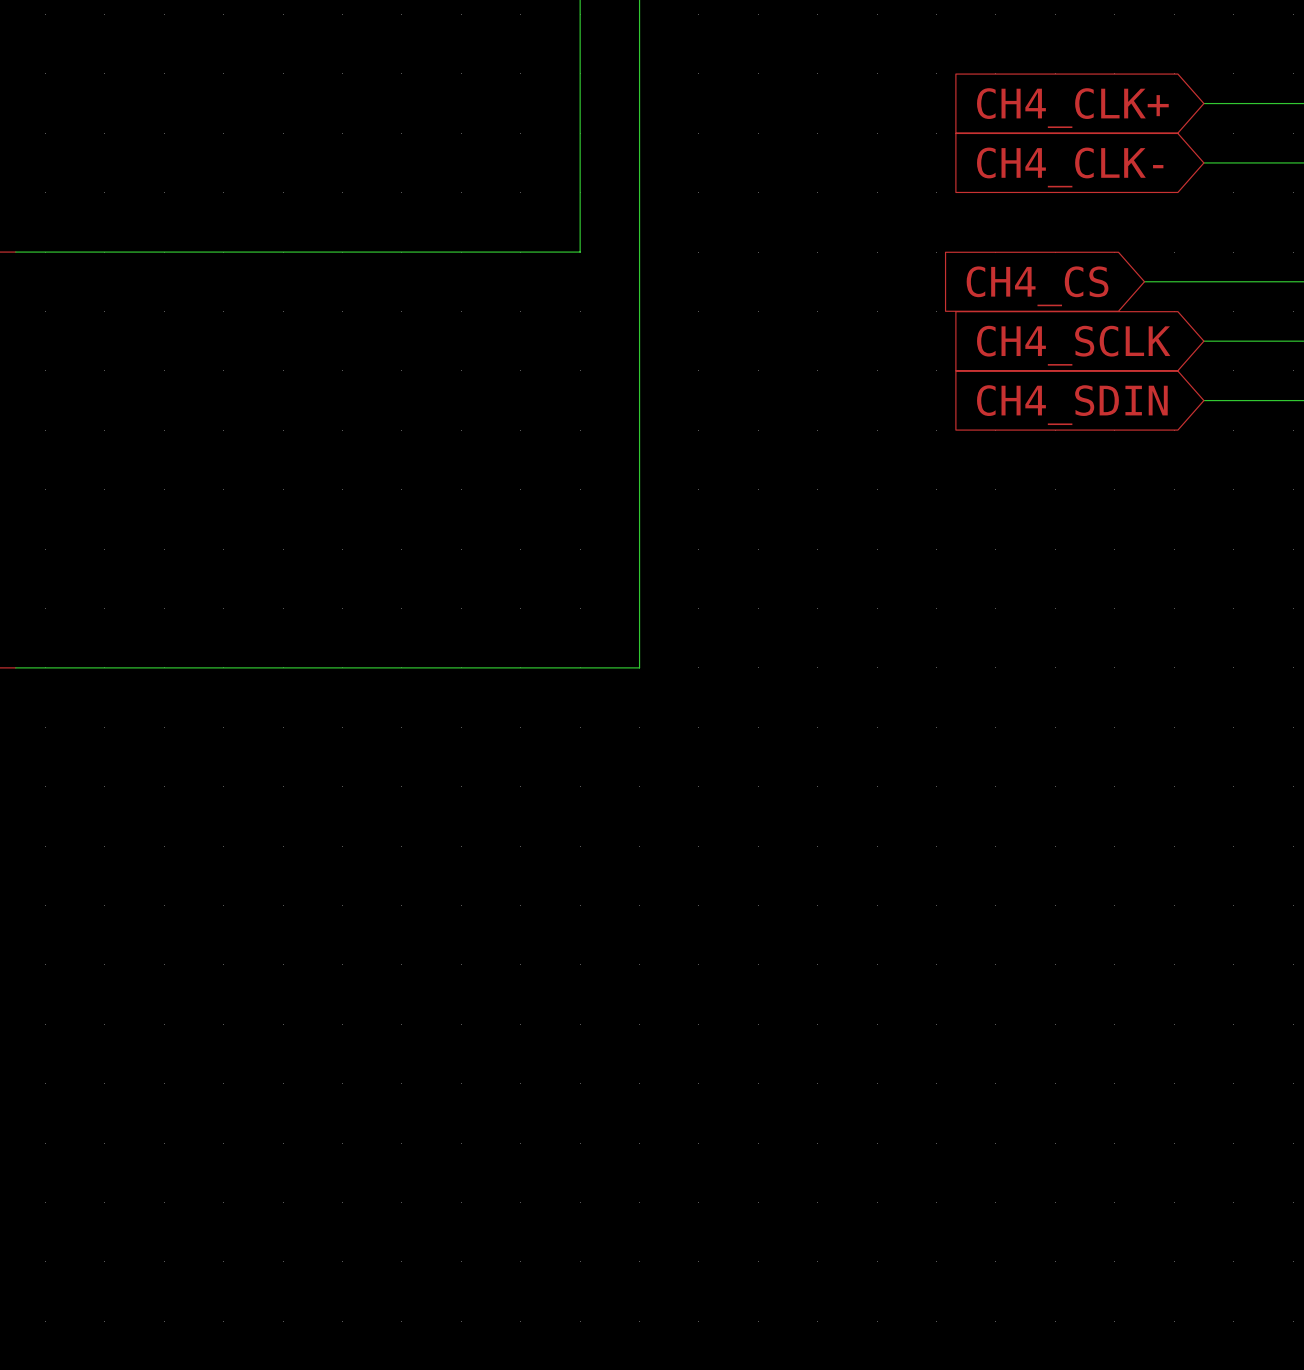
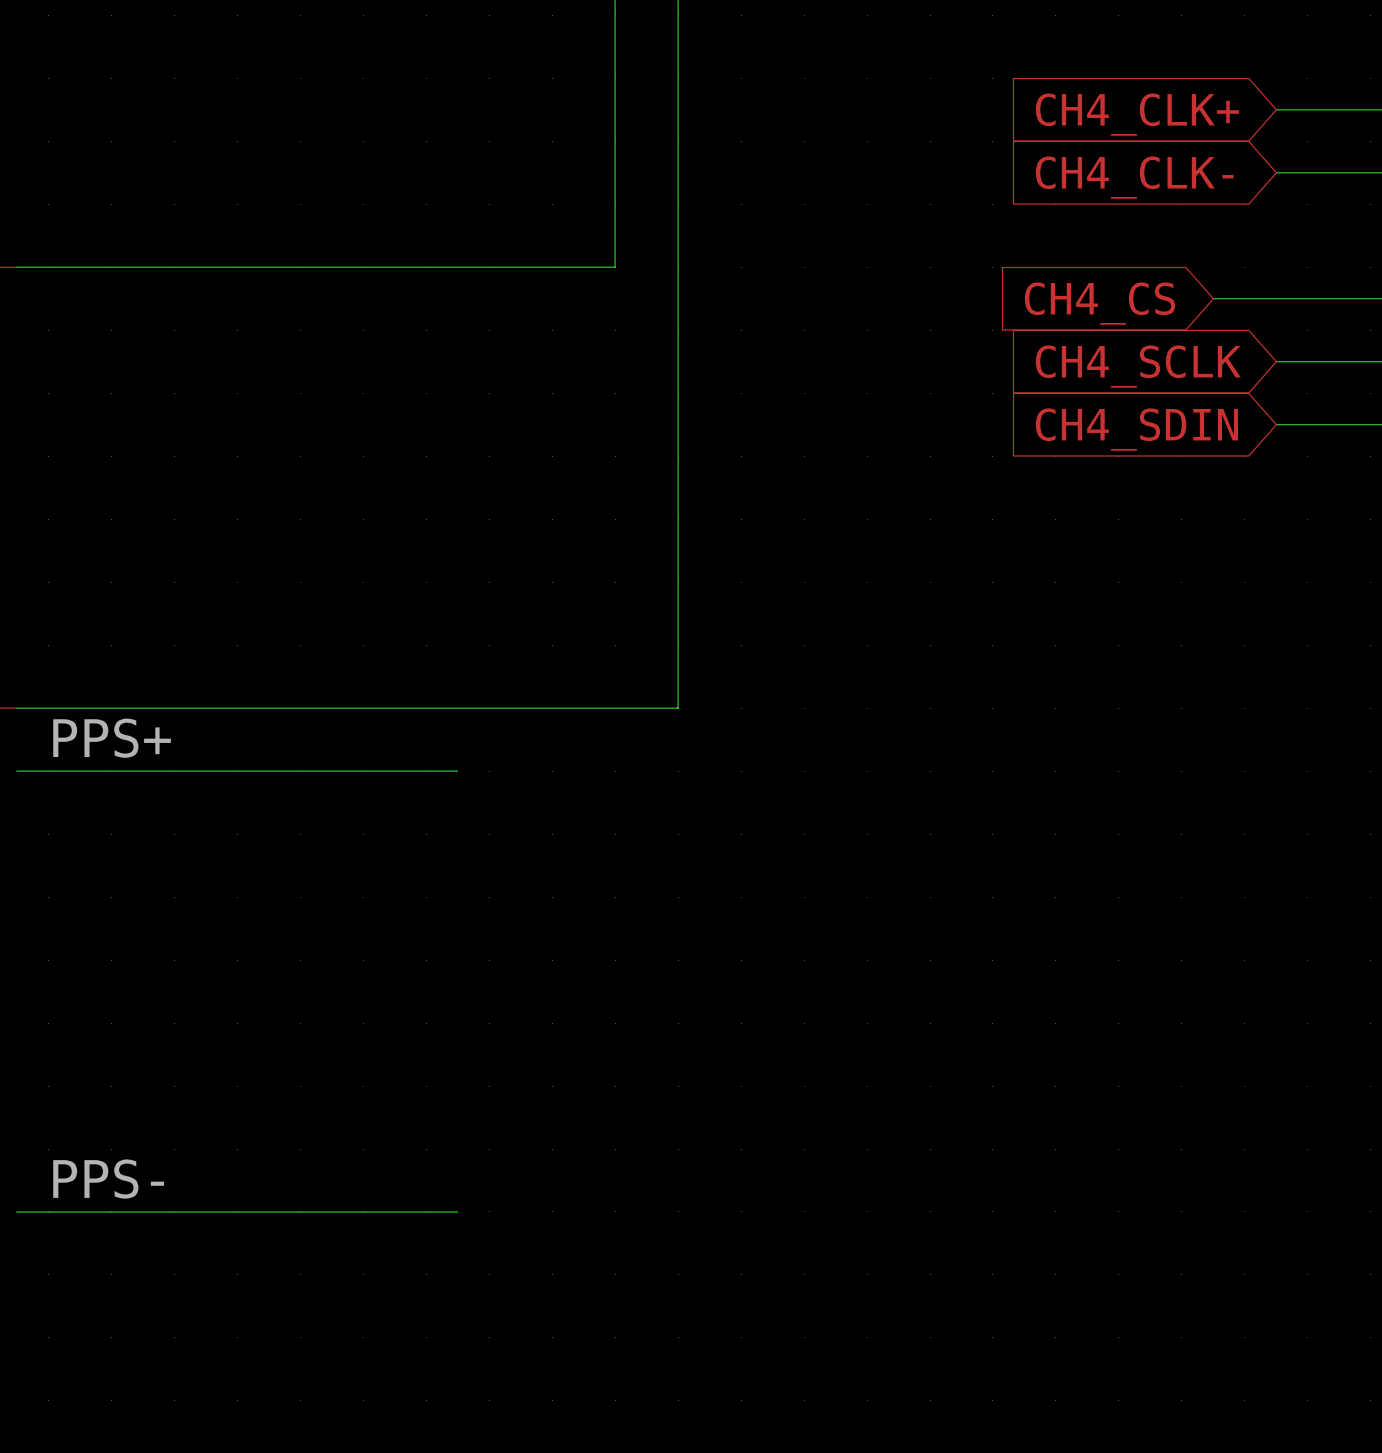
label: none -> PPS+ (112, 738)
wire: none -> (16, 771) (457, 771)
label: none -> PPS- (108, 1179)
wire: none -> (16, 1211) (457, 1211)

